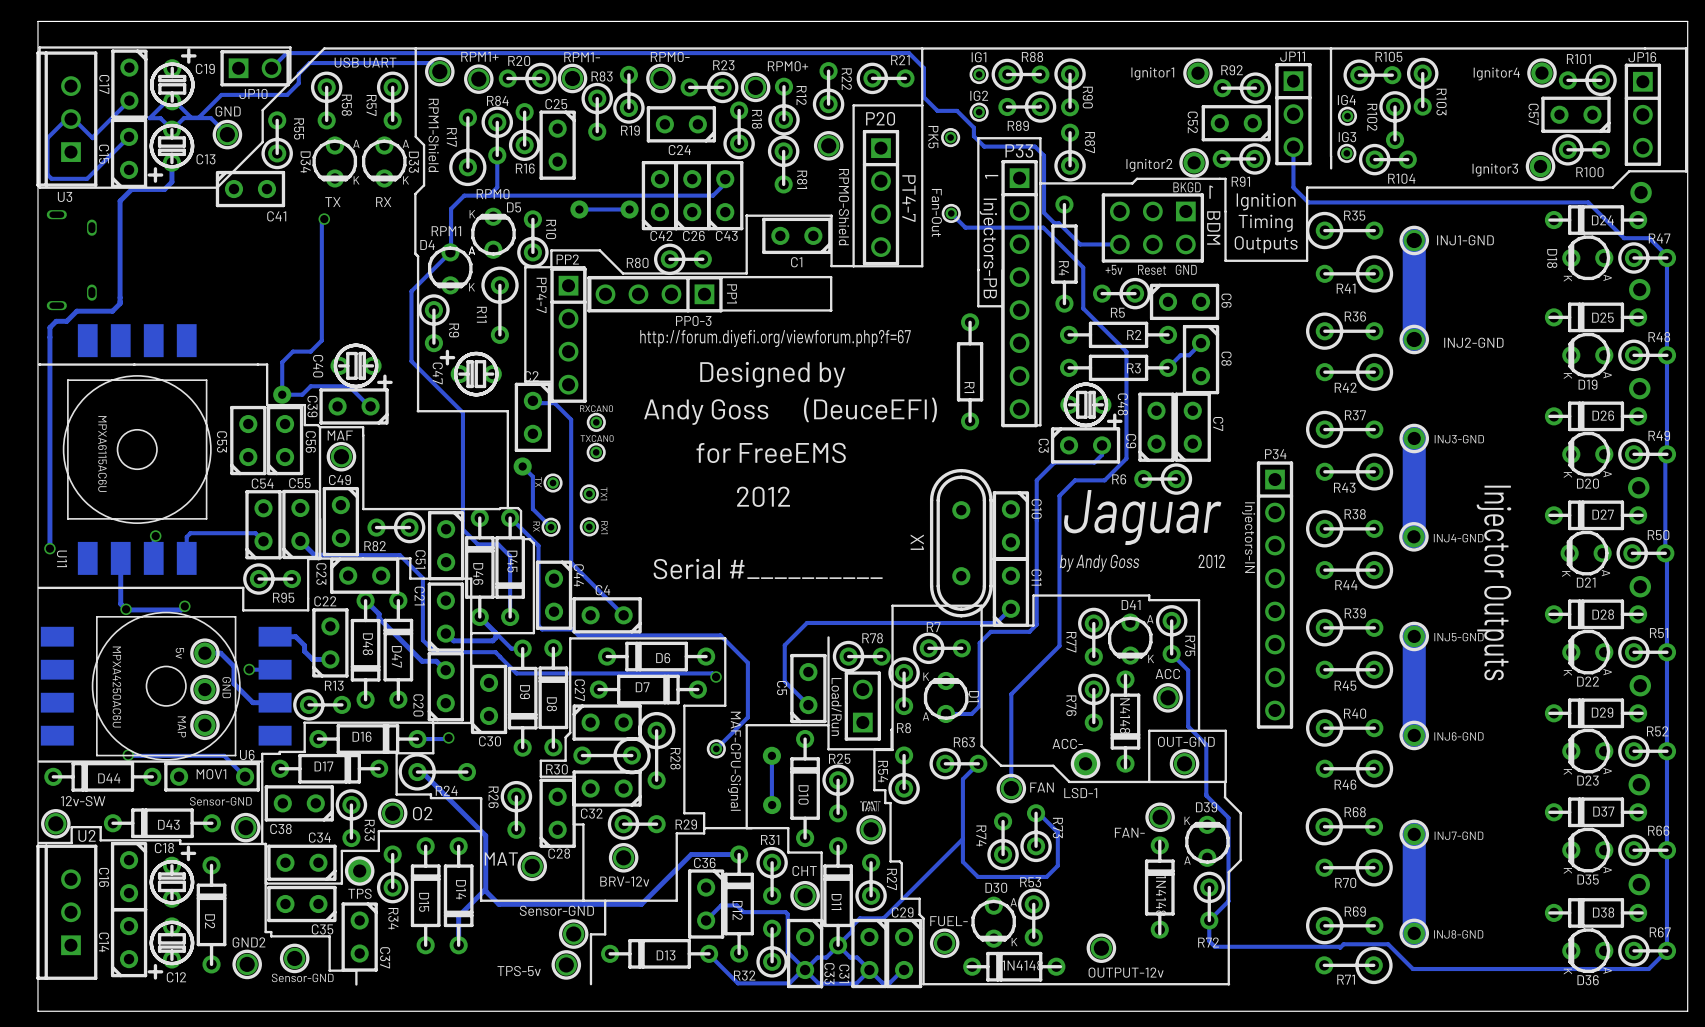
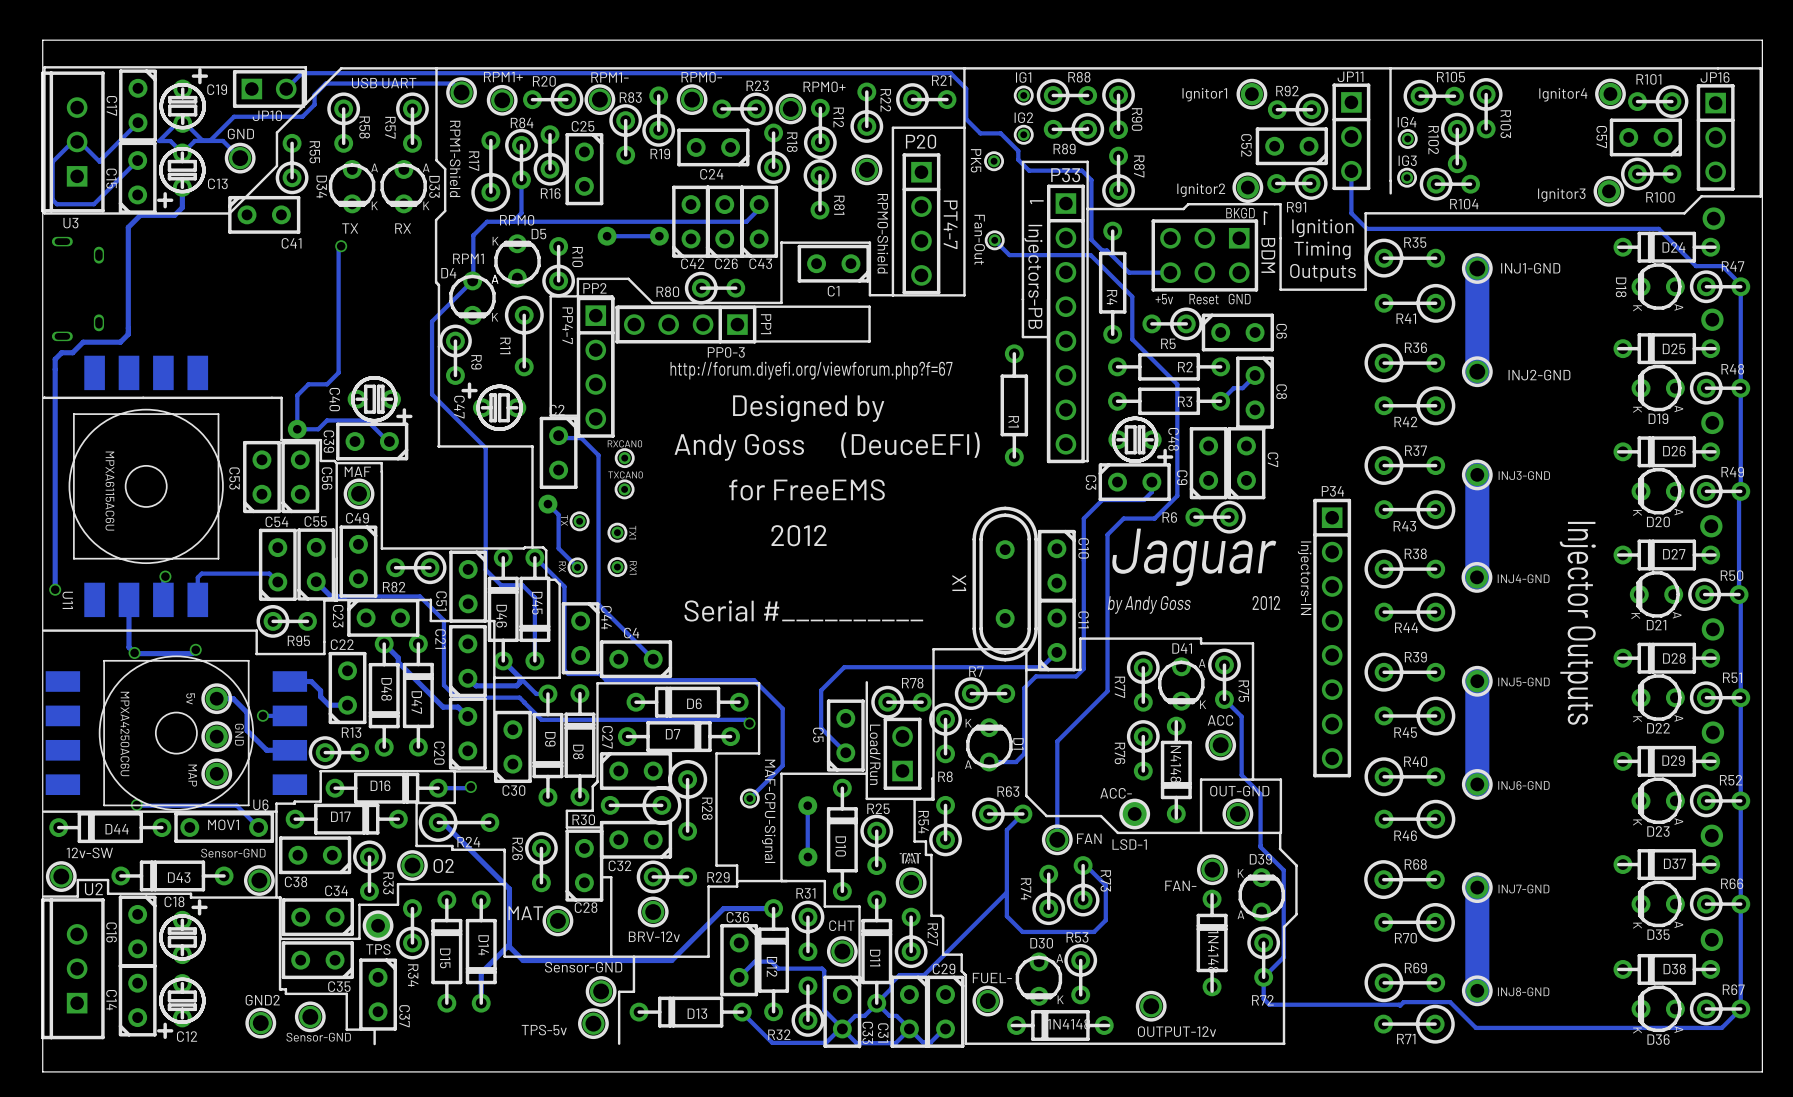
text position: Injector Outputs (1493, 582) -> Injector Outputs (1577, 623)
D2: (211, 914) -> none

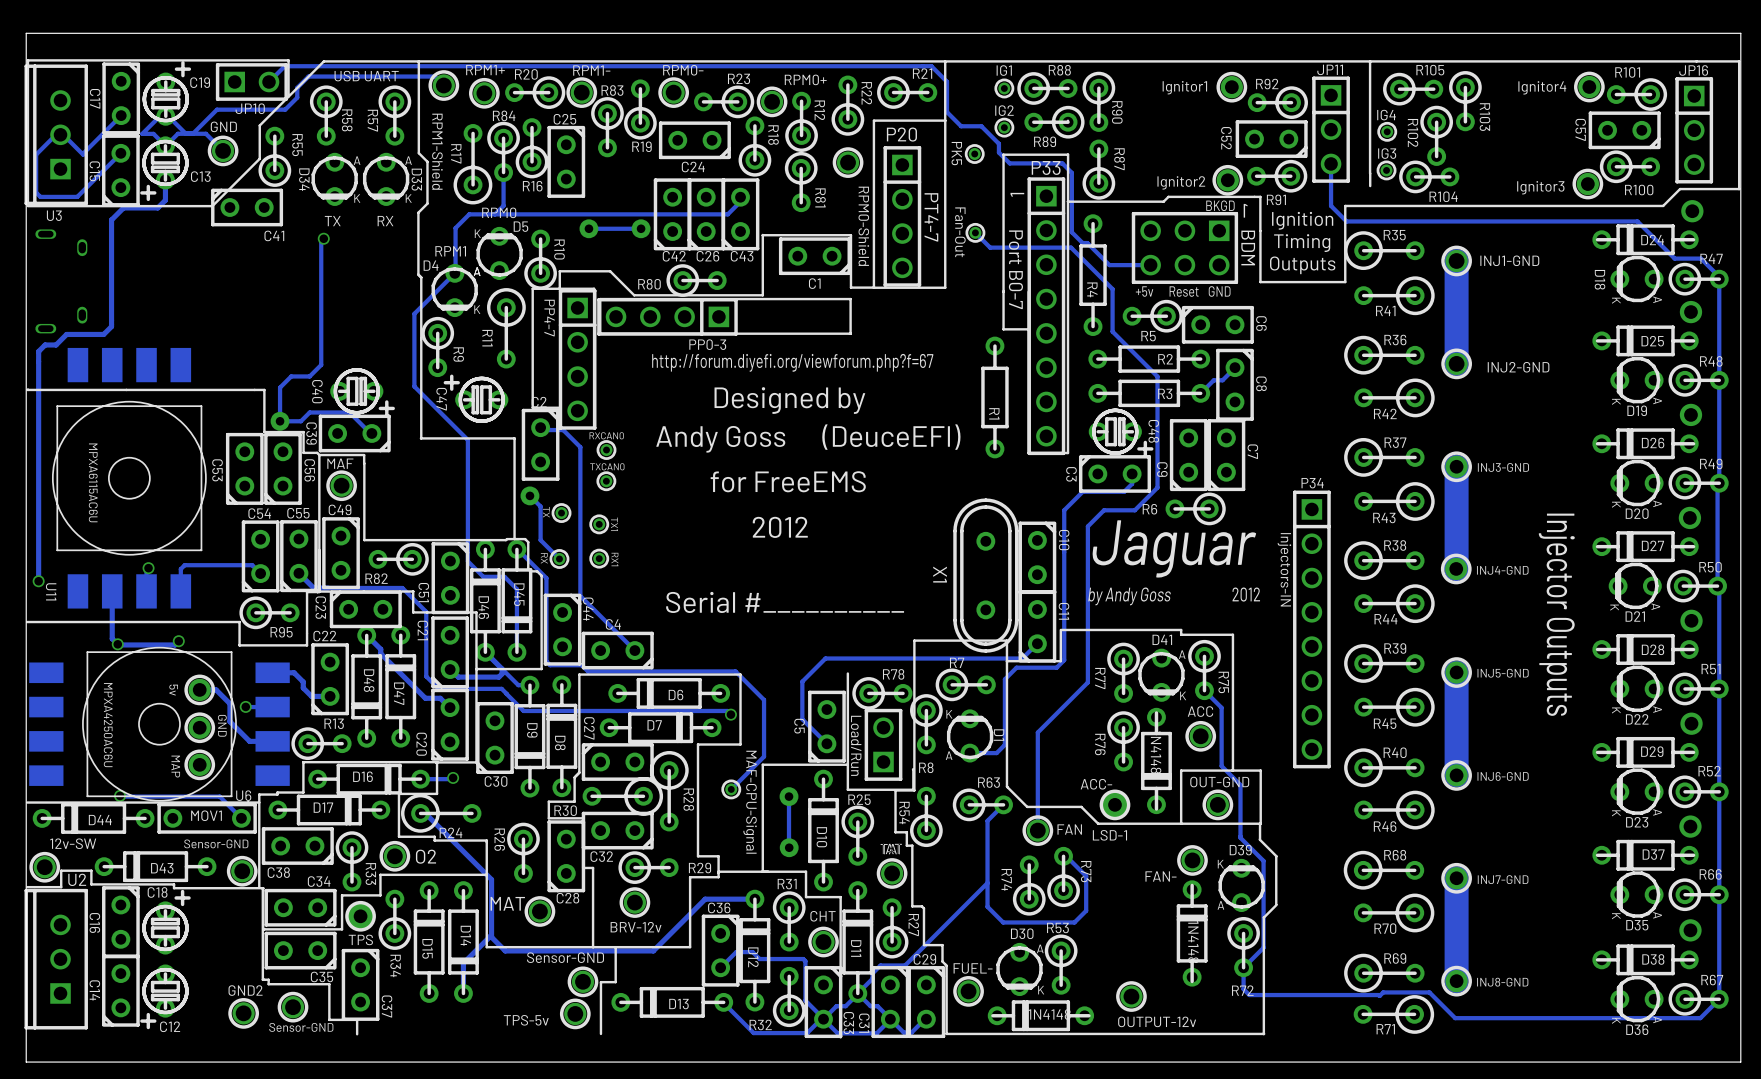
P33 value: Injectors-PB (1033, 276) -> Port B0-7 (1015, 269)
PP2 name: PP2 (594, 288) -> none
PP1 name: PP1 (766, 324) -> none

